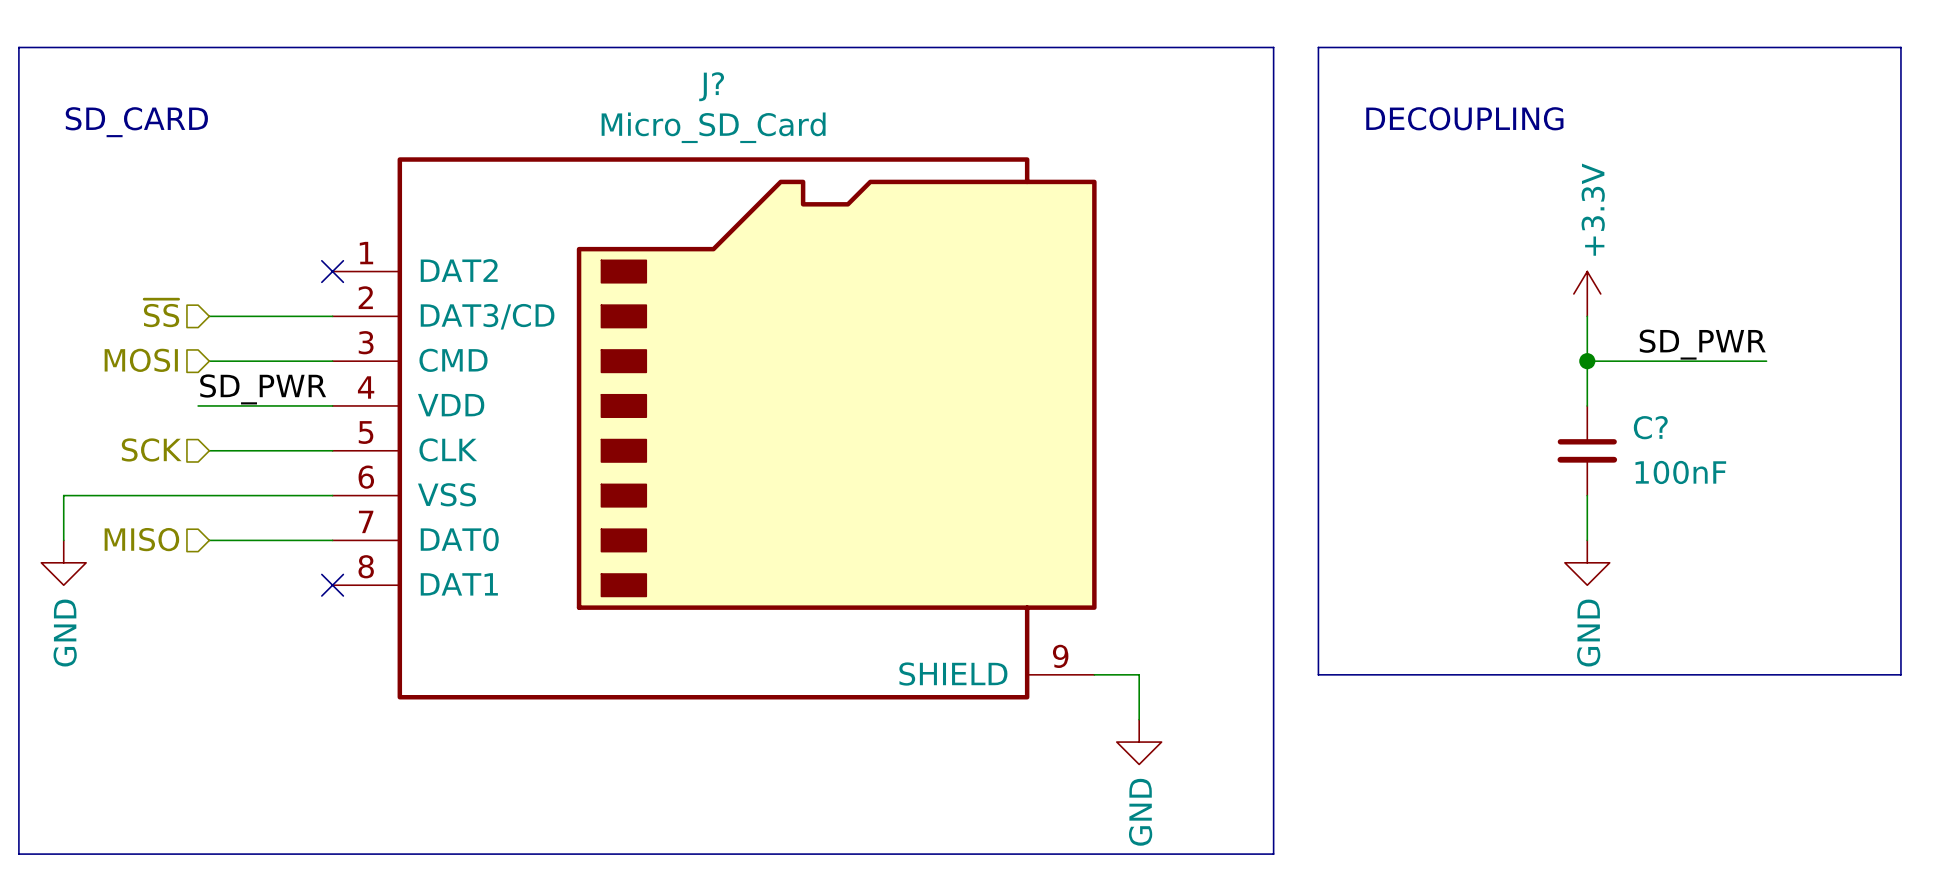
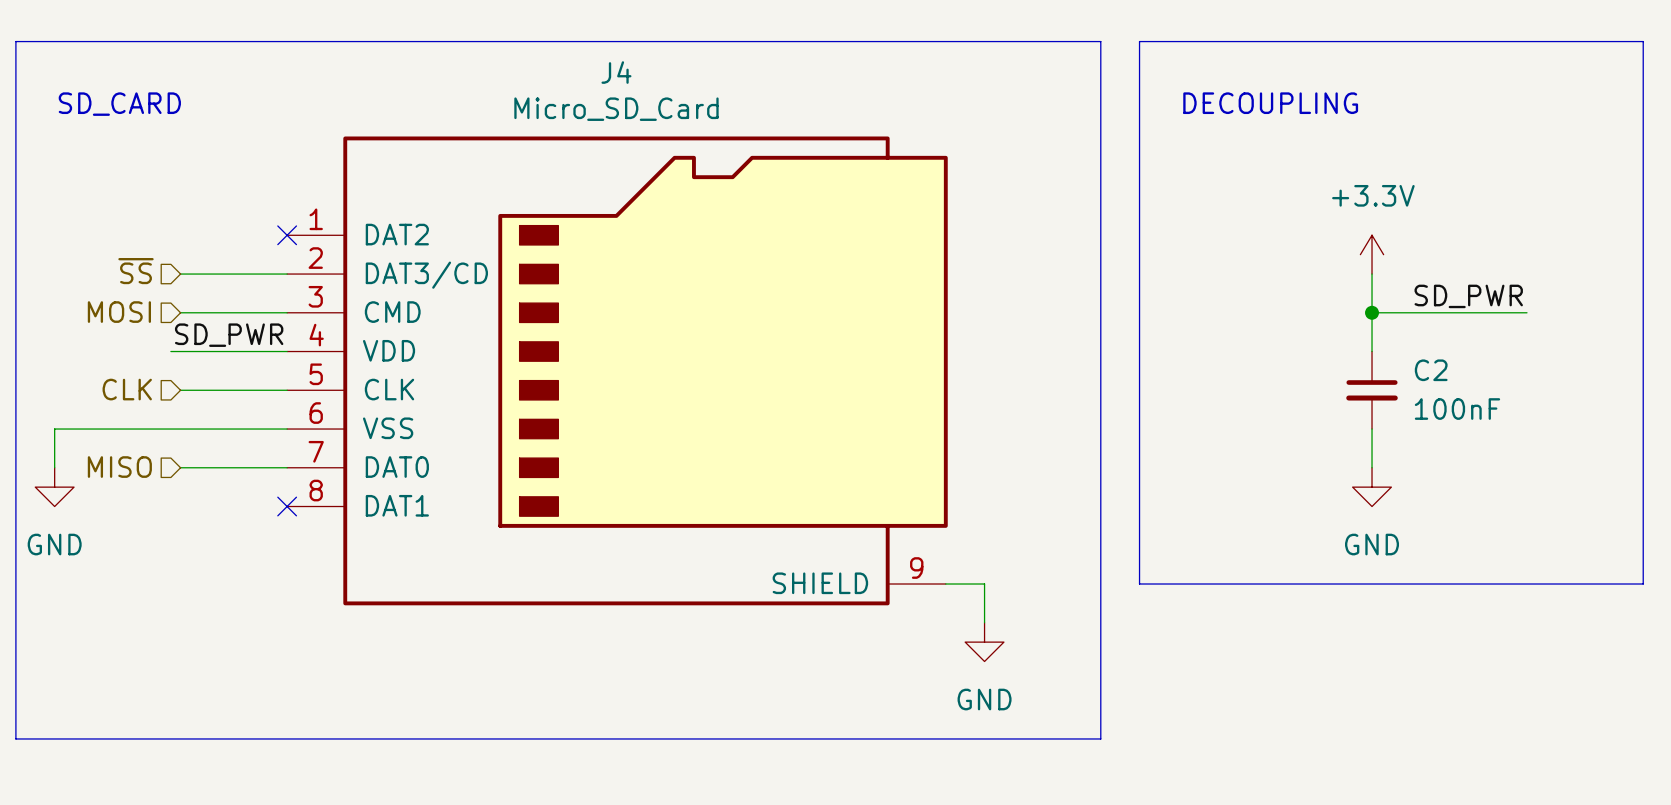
J? name: J? (711, 86) -> J4 (616, 72)
power symbol text rotation: 0° (1593, 209) -> 90° clockwise (1373, 195)
C? name: C? (1650, 427) -> C2 (1431, 370)
hierarchical label: SCK (151, 449) -> CLK (127, 389)
power symbol text rotation: 0° (65, 633) -> 90° clockwise (54, 544)
power symbol text rotation: 0° (1588, 633) -> 90° clockwise (1372, 544)
power symbol text rotation: 0° (1140, 812) -> 90° clockwise (984, 699)

